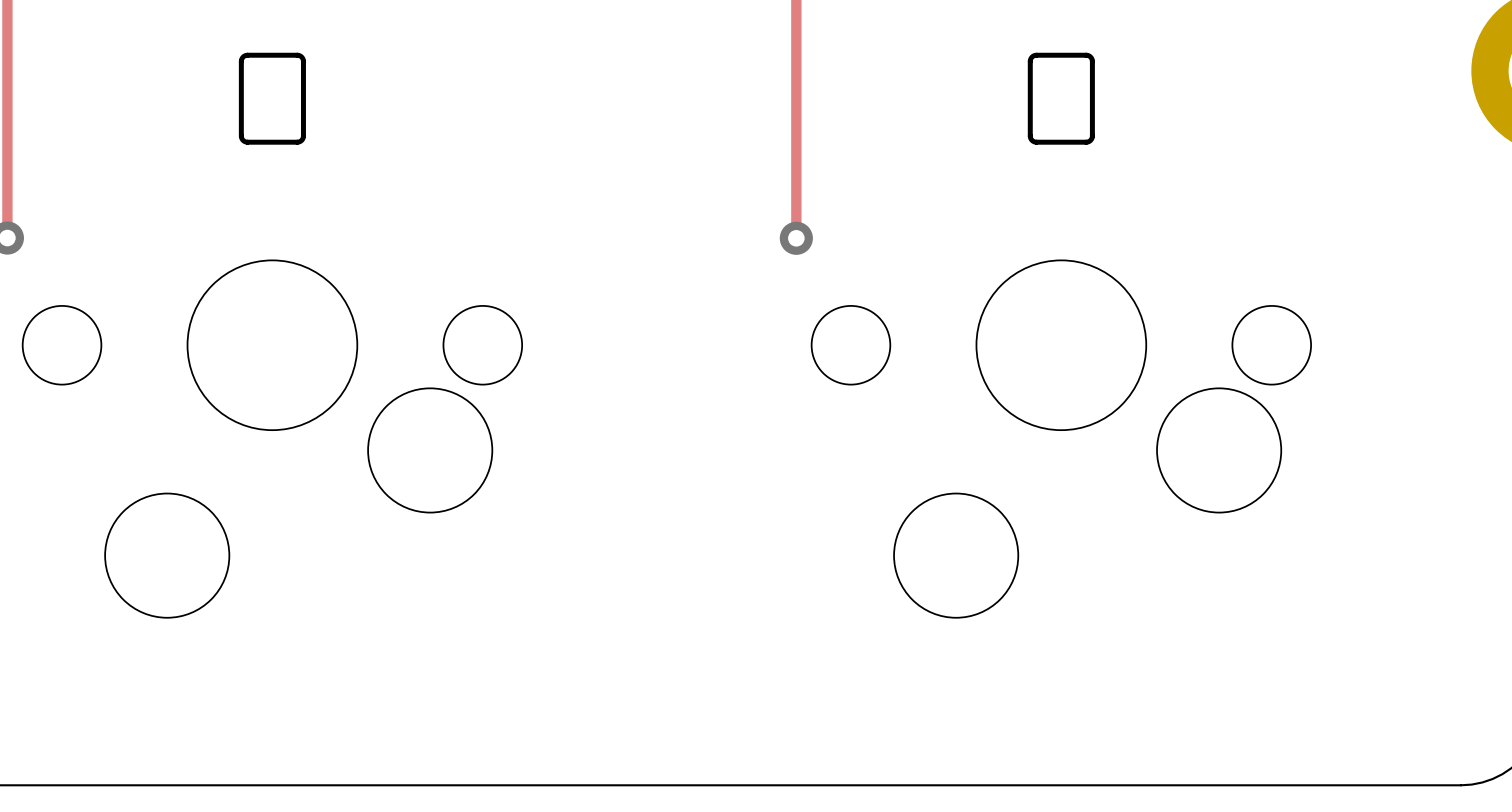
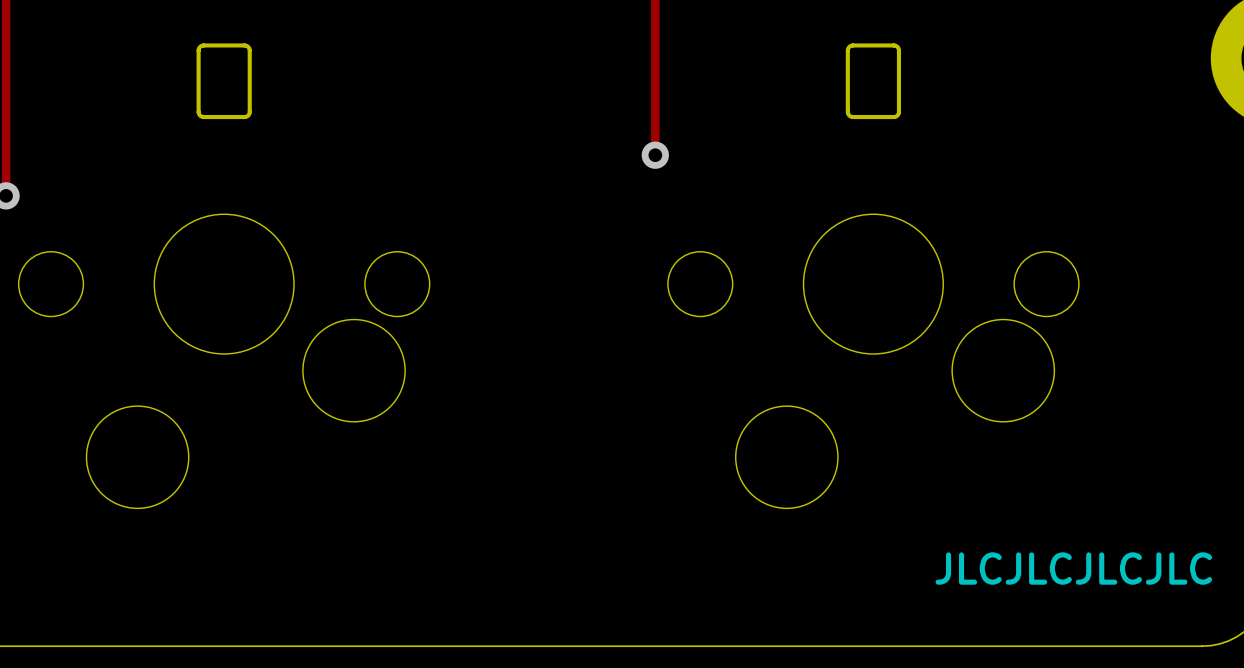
track: (796, 188) (796, 238) -> none
via position: (796, 238) -> (655, 155)
text: none -> JLCJLCJLCJLC (1073, 568)

